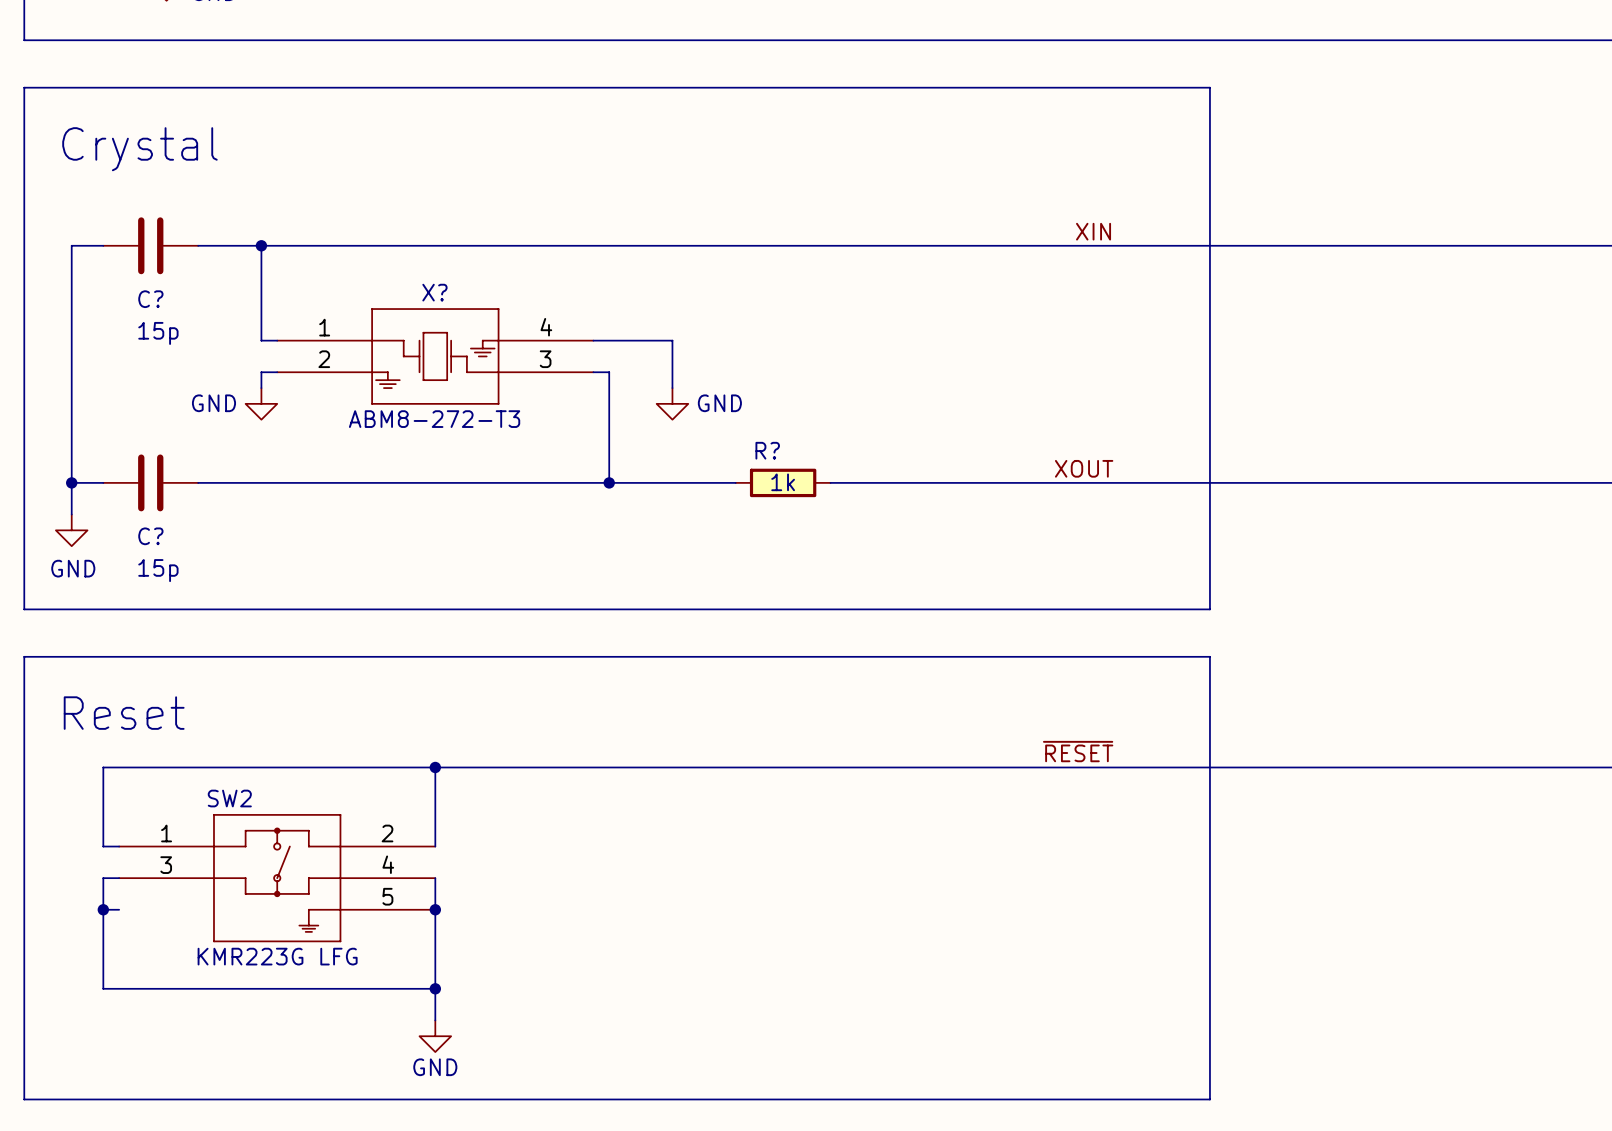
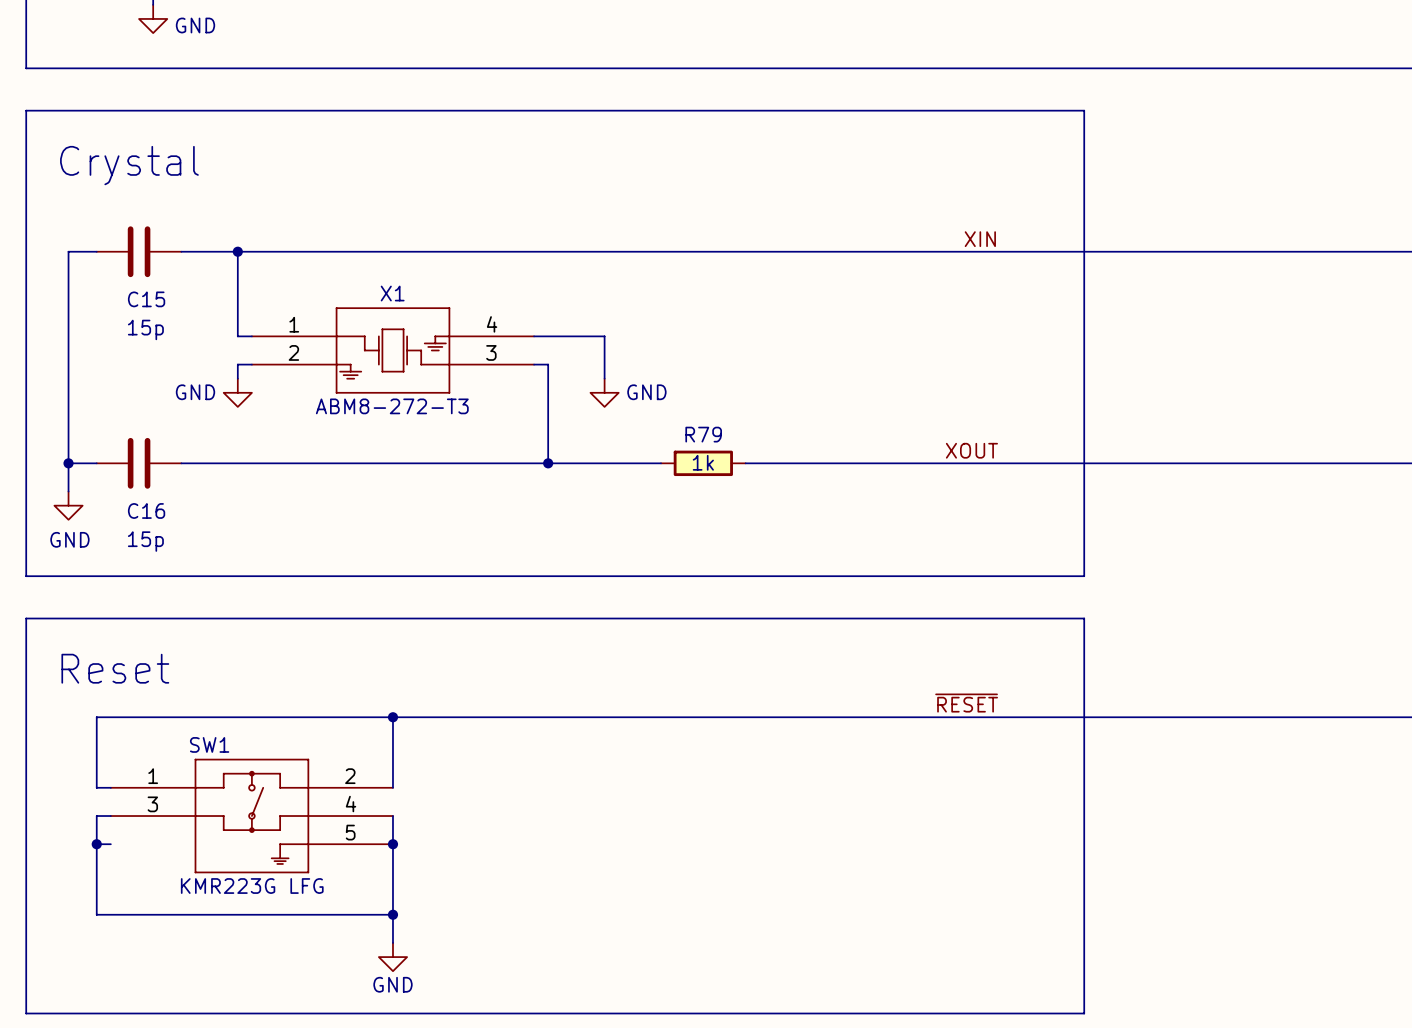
X? name: X? (434, 292) -> X1 (392, 293)
C? name: C? (150, 299) -> C15 (146, 299)
R? name: R? (767, 450) -> R79 (703, 434)
C? name: C? (150, 536) -> C16 (146, 510)
SW2 name: SW2 (229, 798) -> SW1 (209, 744)

